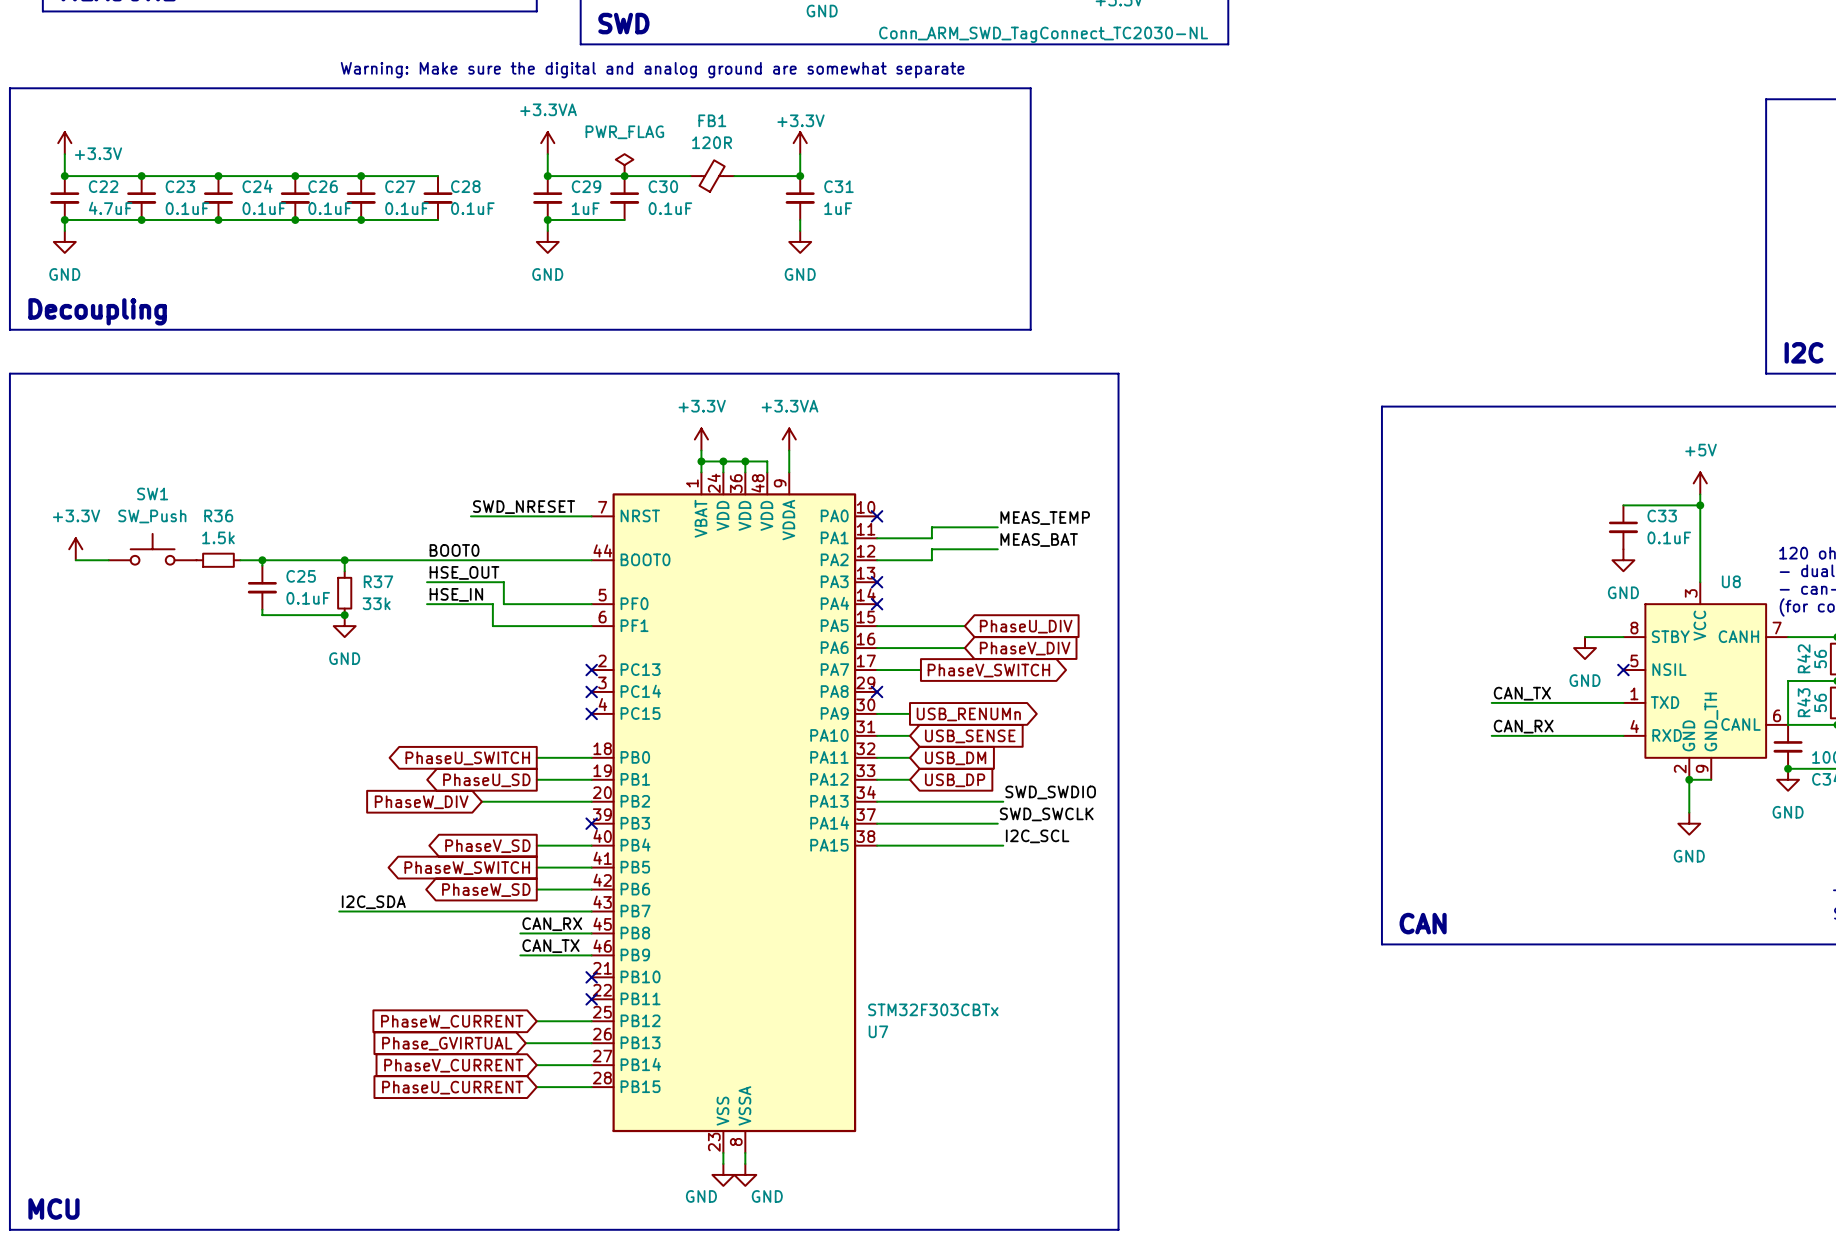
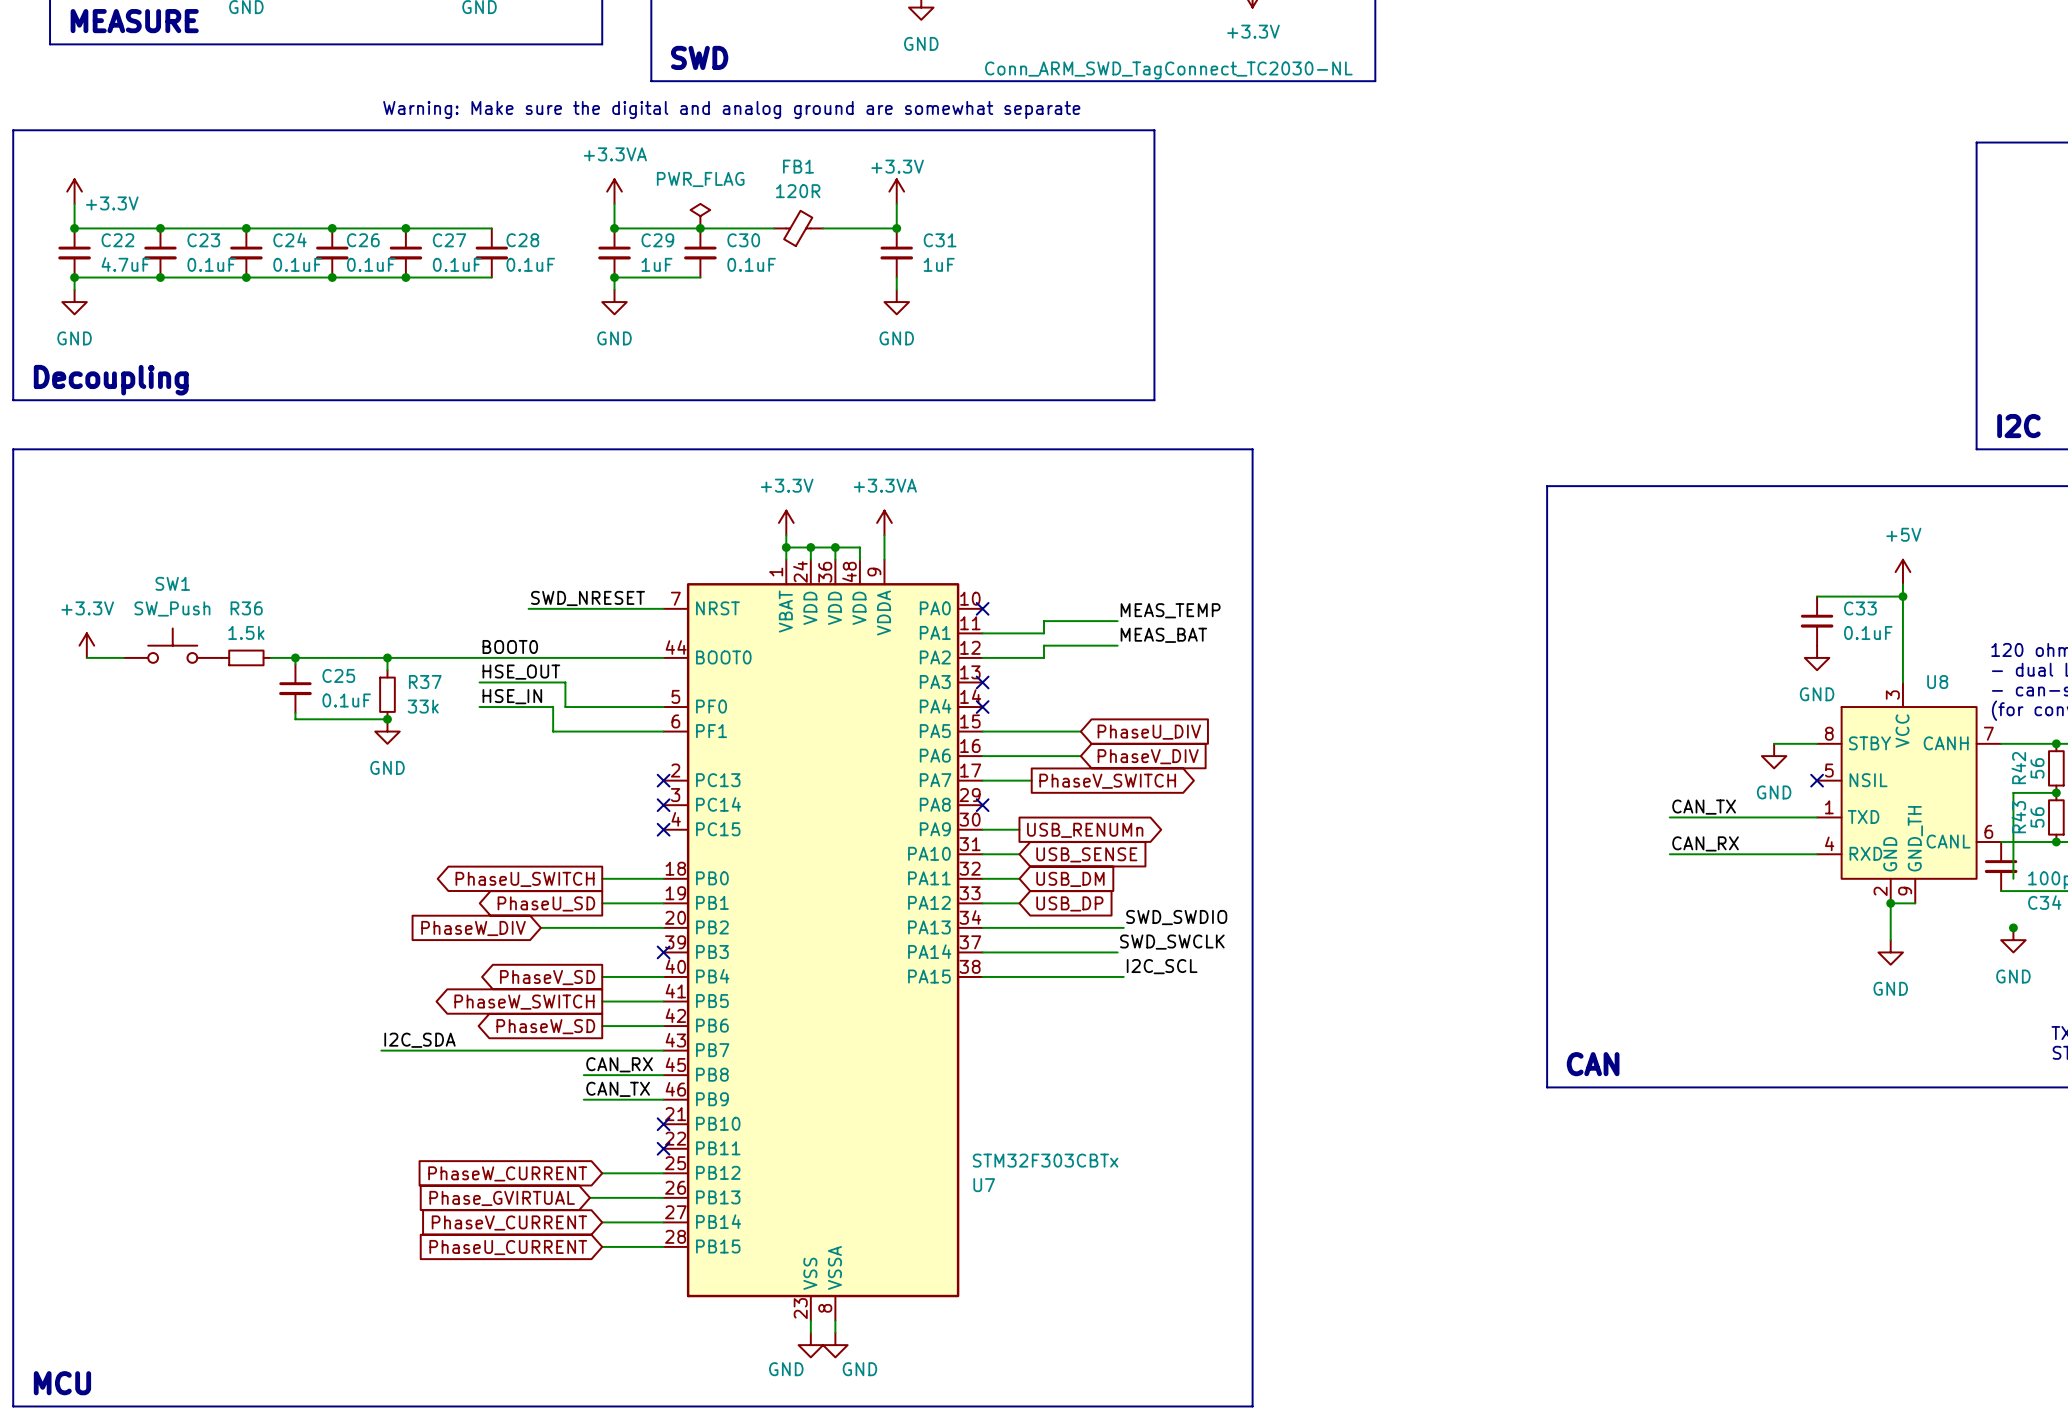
wire: (1799, 680) (1788, 680) (1788, 724) -> (2013, 792) (2013, 878)
junction position: (1788, 768) -> (2013, 927)
power symbol position: GND (1788, 779) -> GND (2013, 940)

